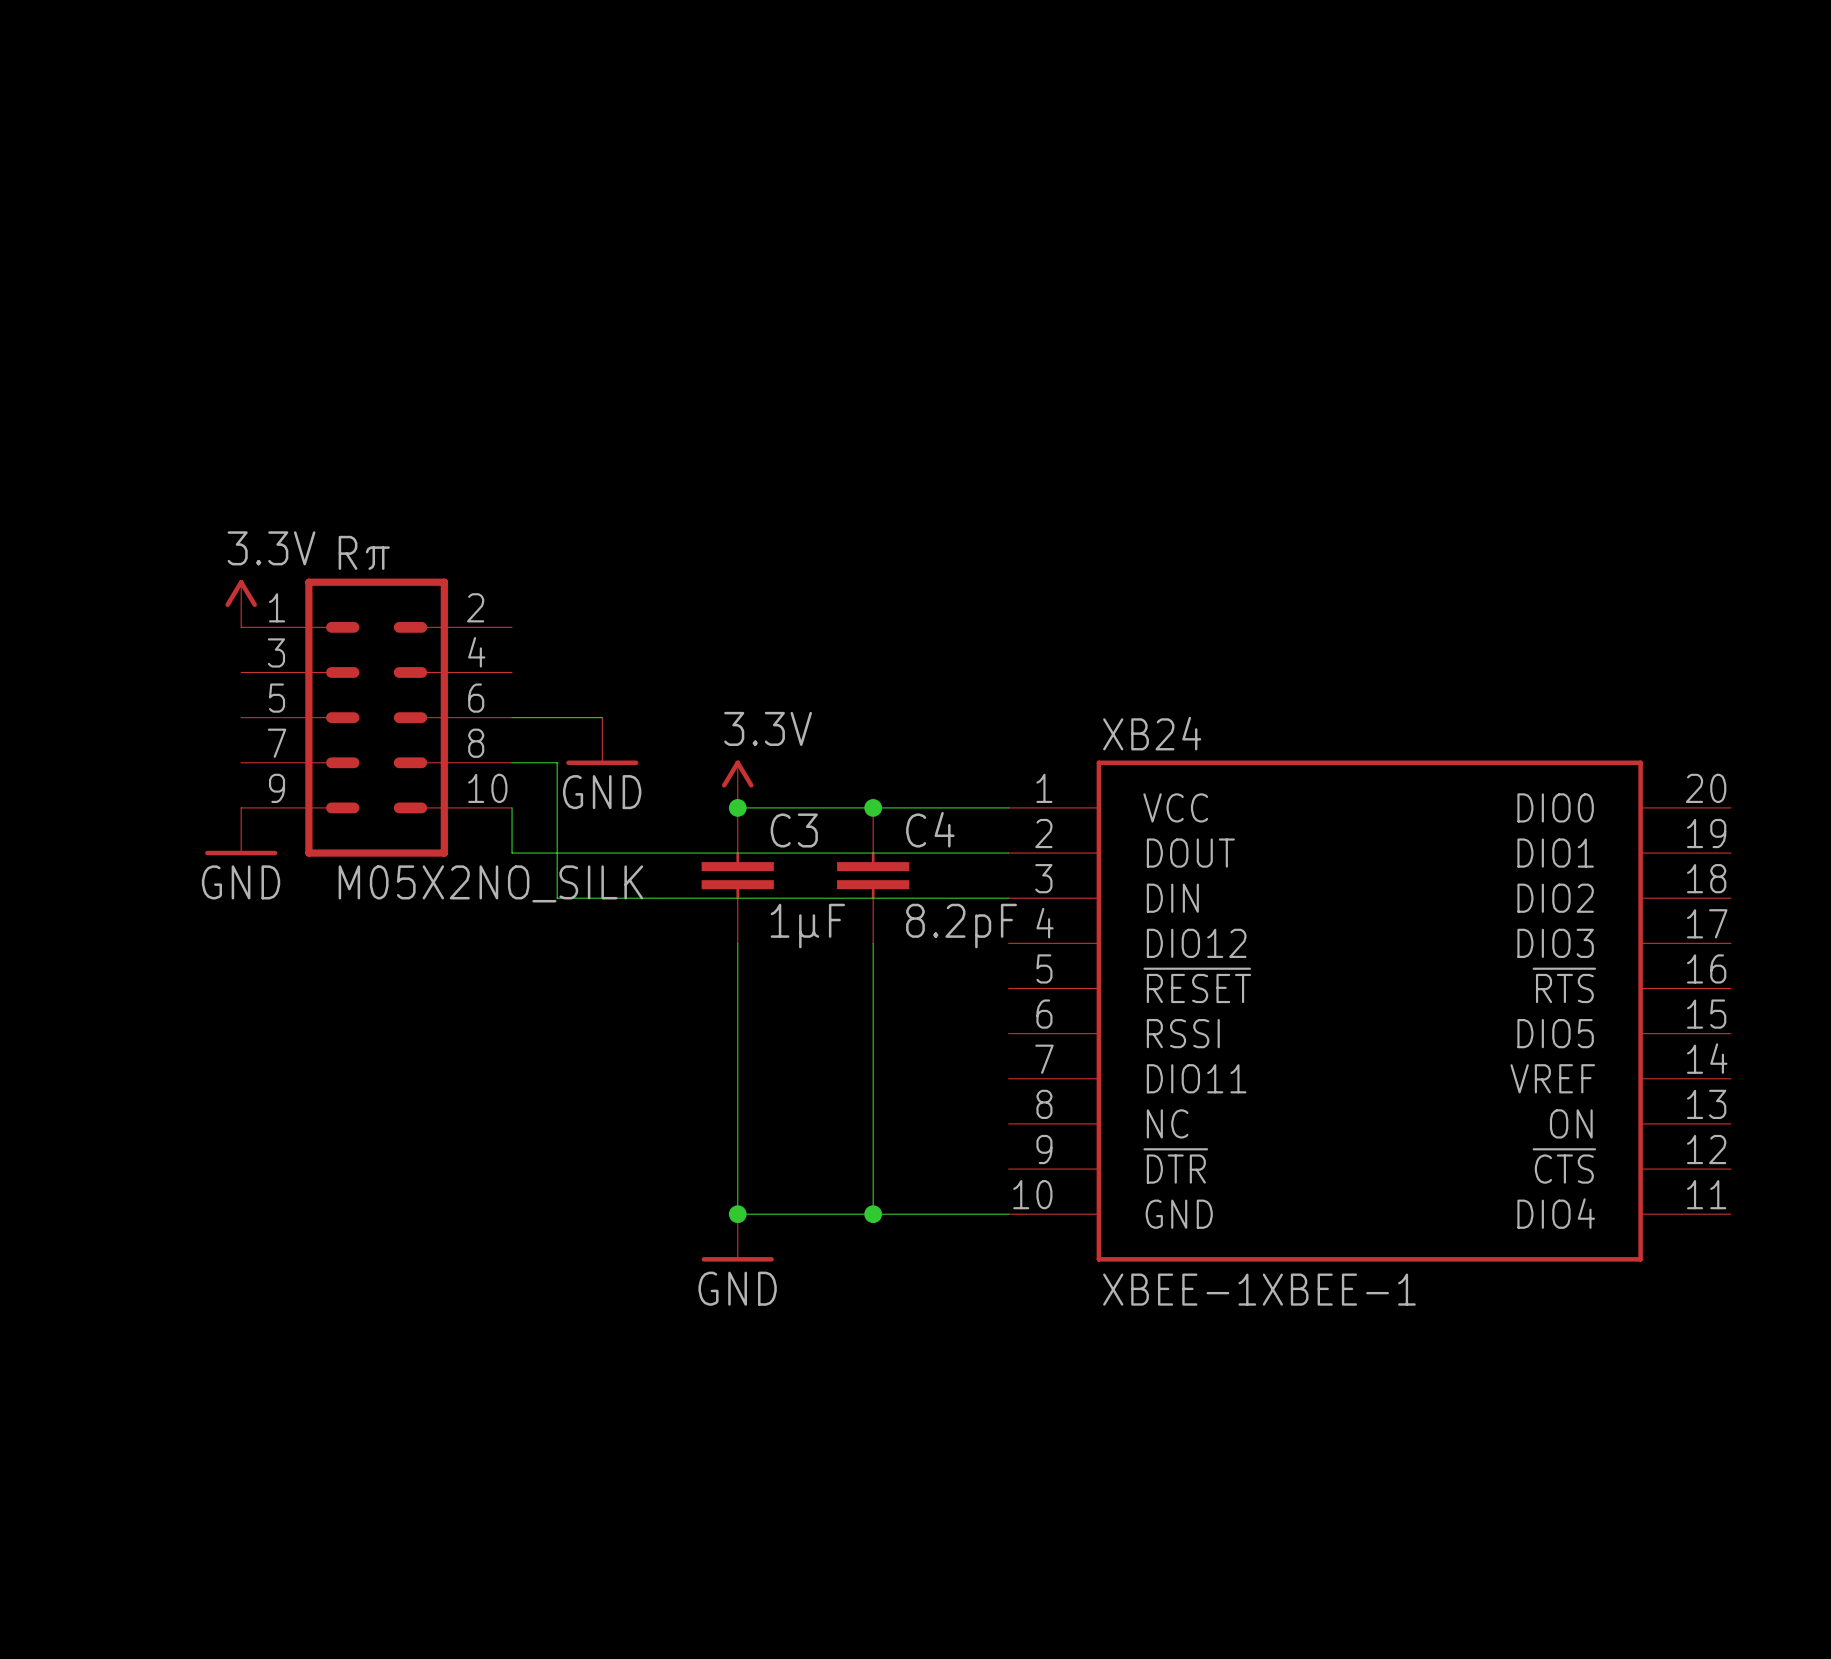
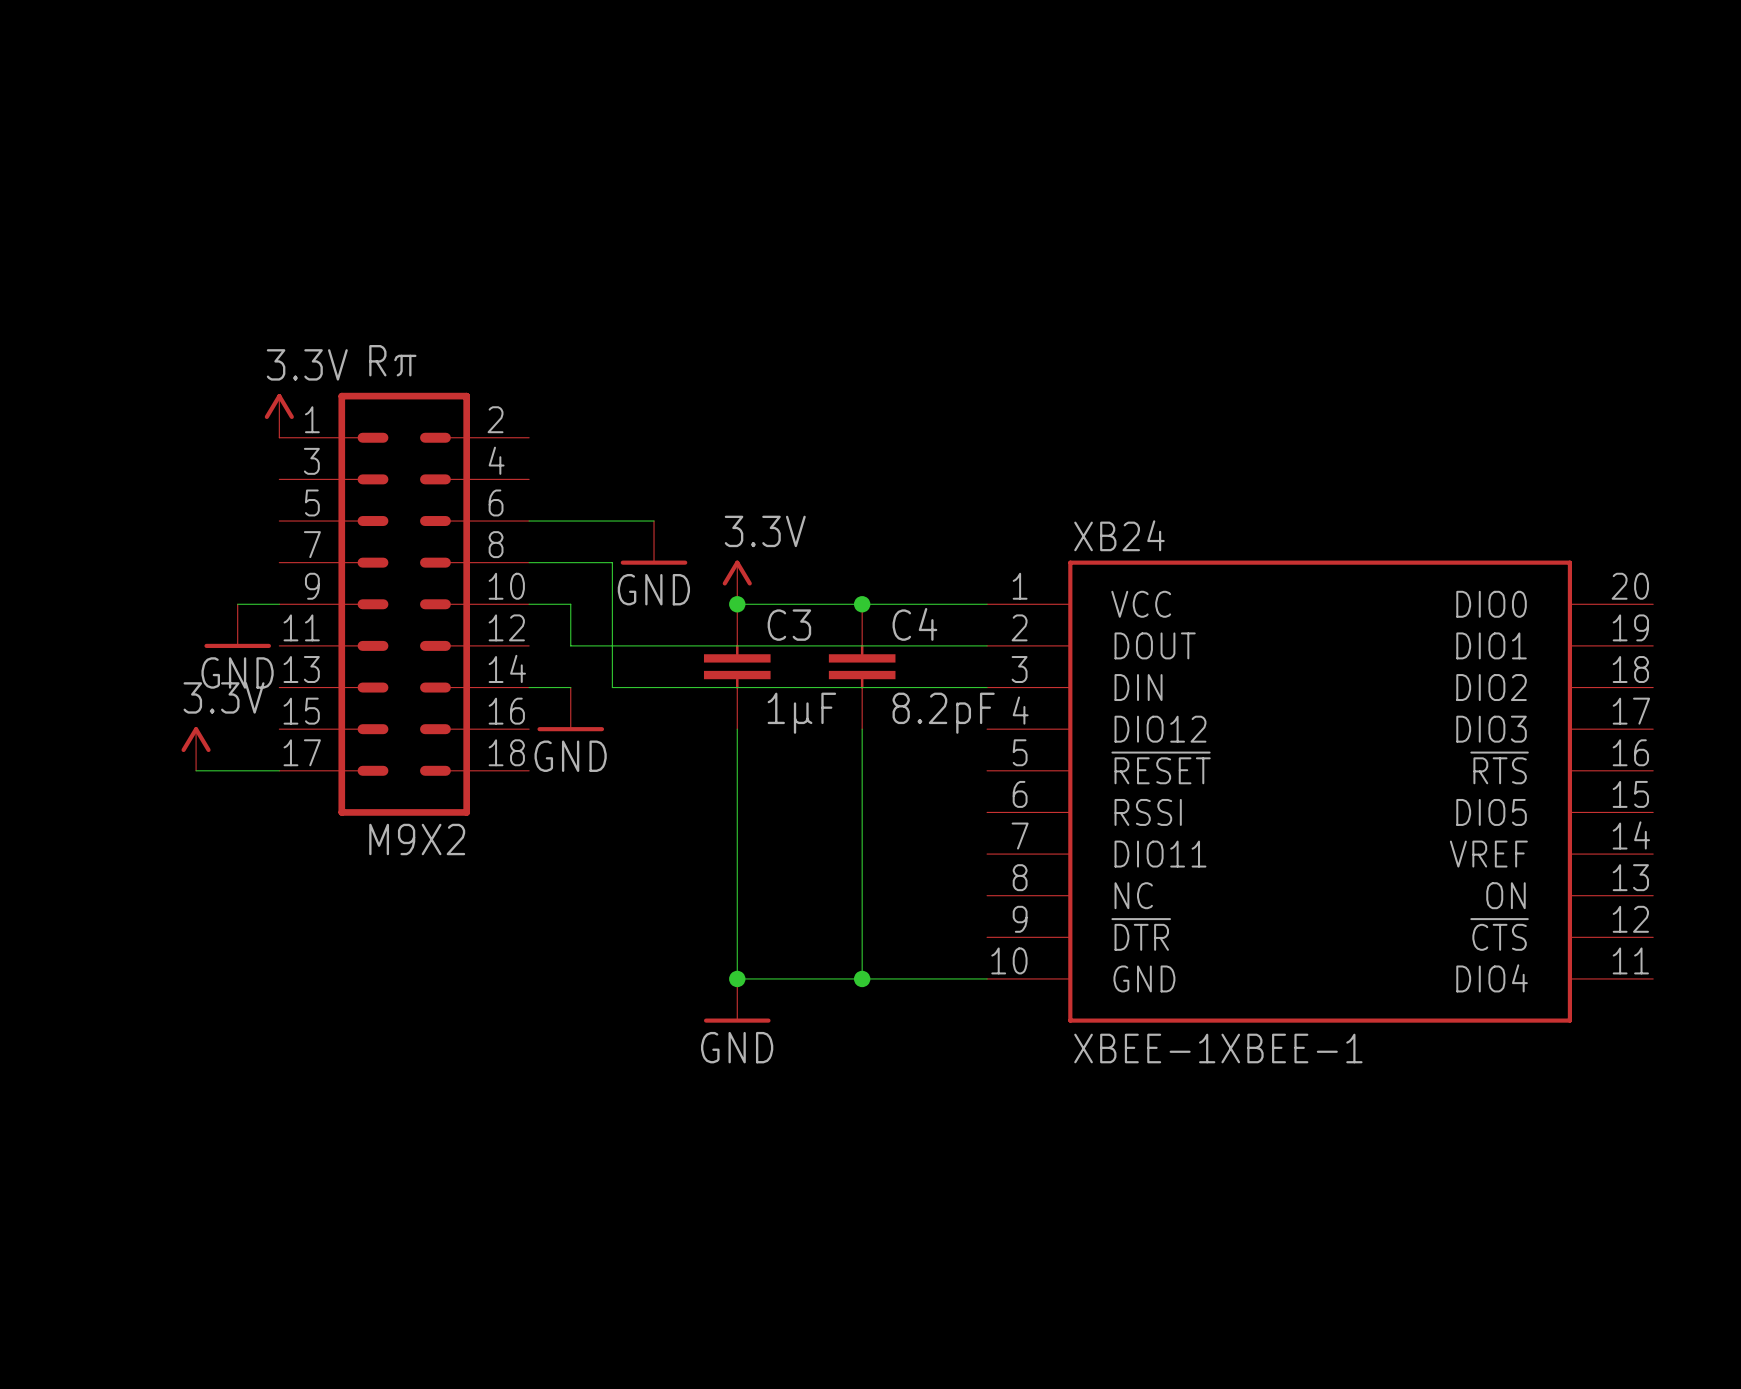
Rπ: M05X2NO_SILK (376, 717) -> none
wire: none -> (612, 521) (654, 521)
power symbol position: GND (602, 741) -> GND (654, 542)
wire: (557, 762) (557, 807) -> (529, 604) (570, 604)
wire: none -> (237, 604) (279, 604)
Rπ: none -> M9X2 (404, 604)
wire: (512, 807) (512, 853) (557, 853) (557, 898) (602, 898) -> (570, 562) (612, 562) (612, 687)
power symbol position: GND (241, 831) -> GND (237, 626)
wire: none -> (529, 687) (570, 687)
power symbol: none -> GND (570, 709)
power symbol: none -> 3.3V (196, 748)
wire: none -> (196, 770) (279, 770)

